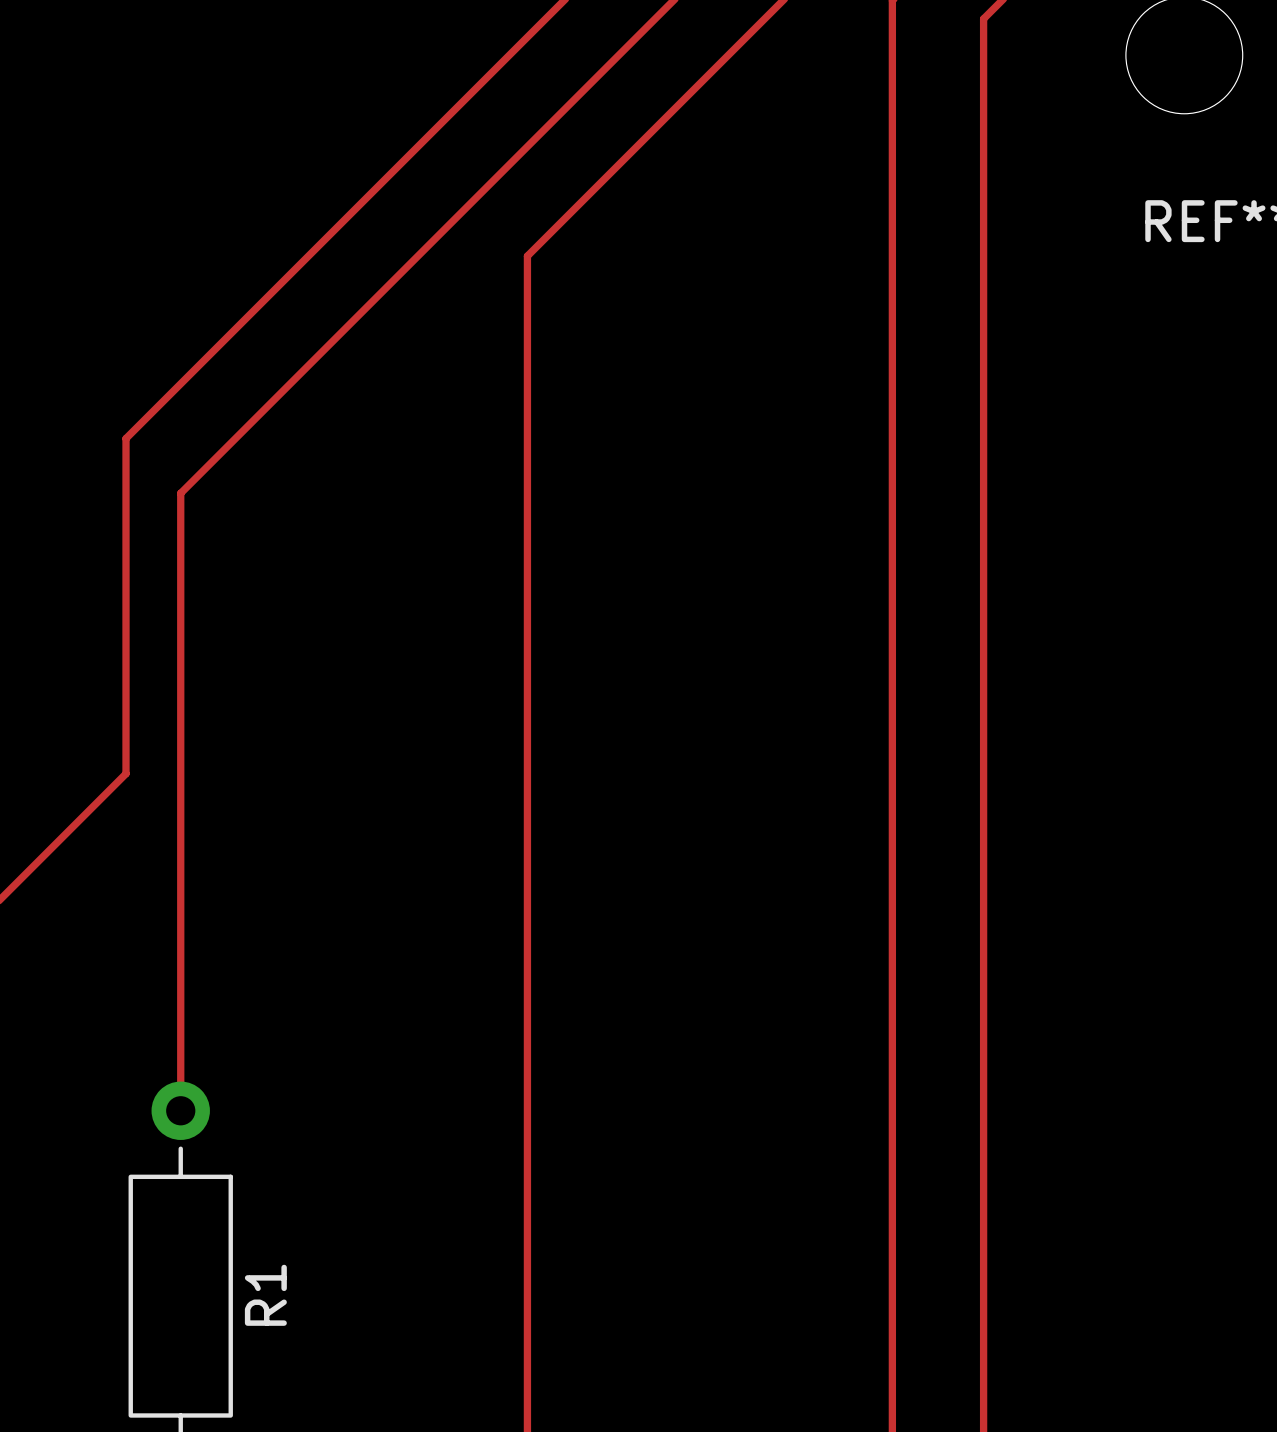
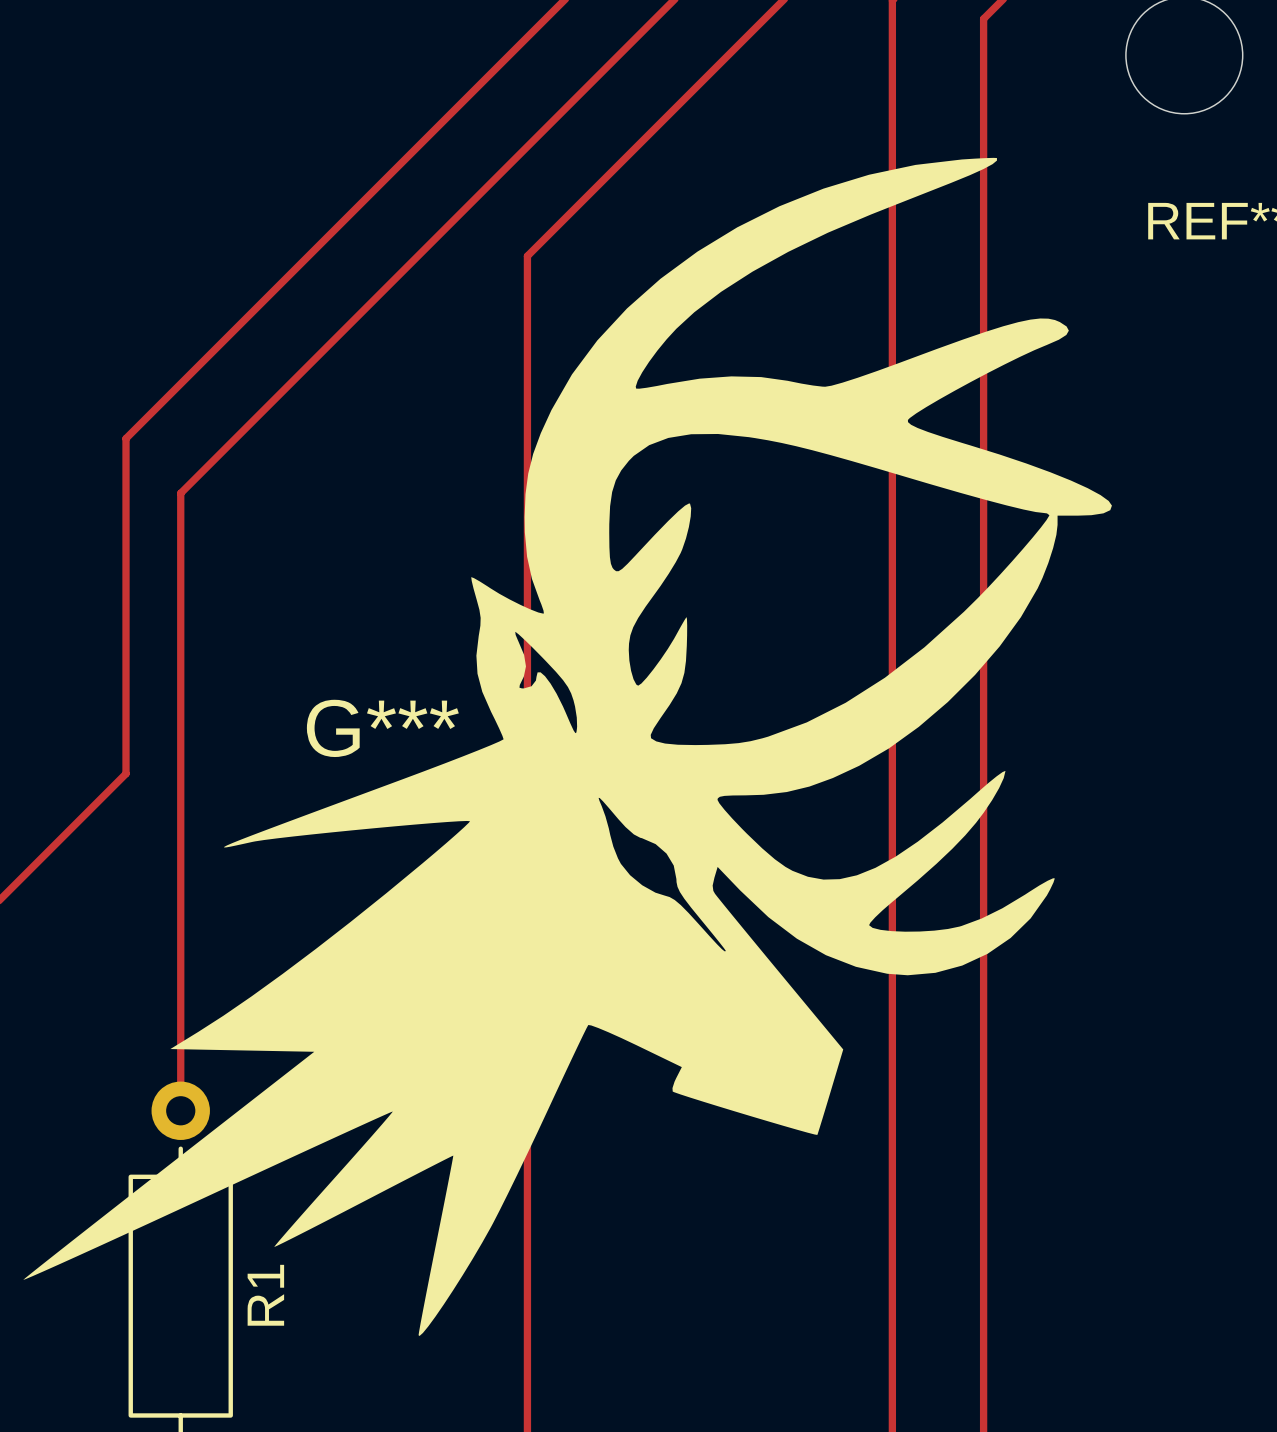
G***: none -> (567, 746)

